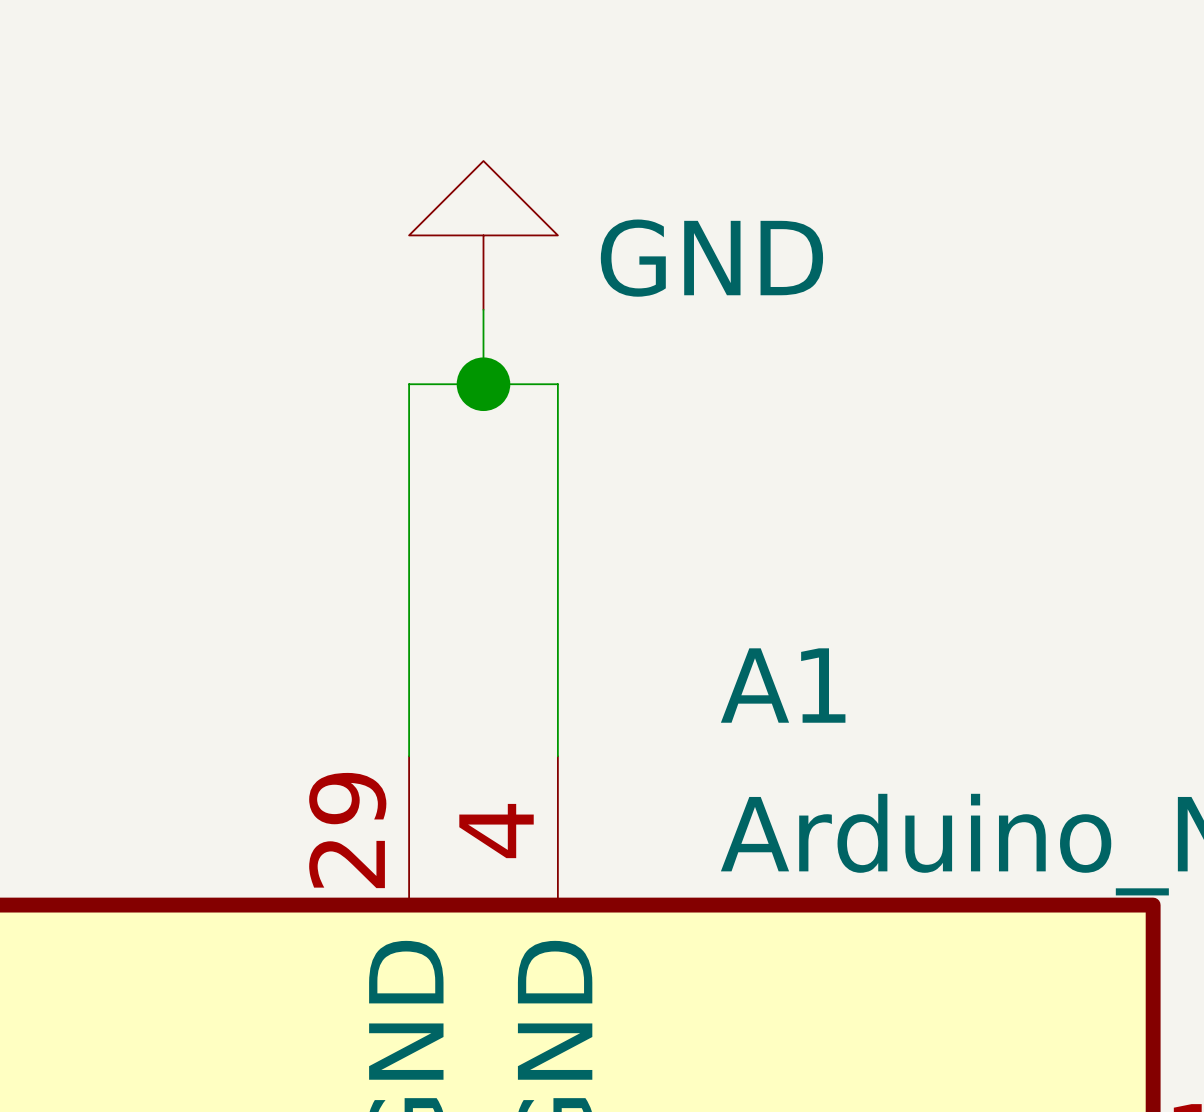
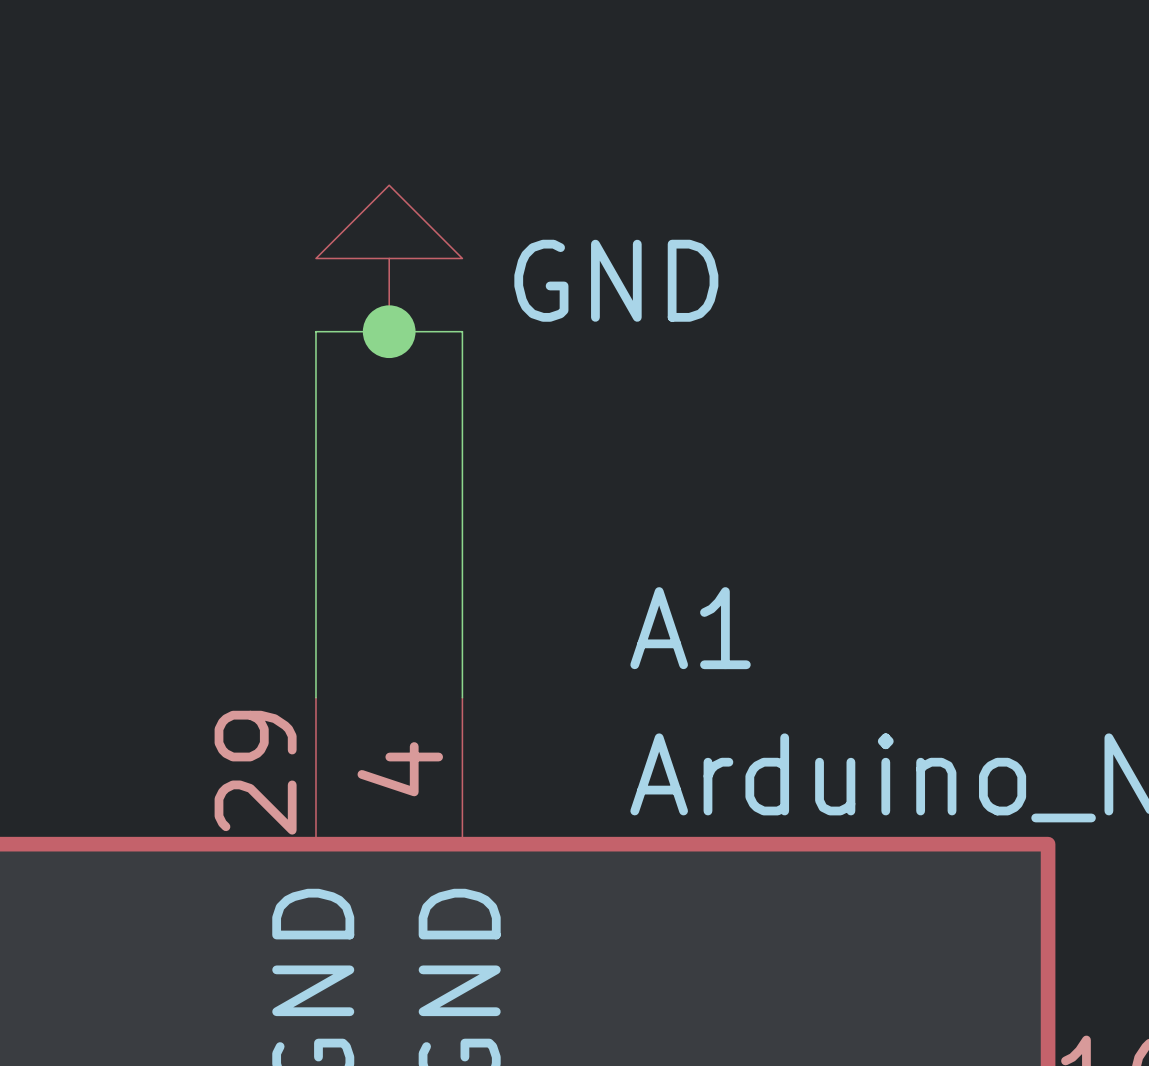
power symbol position: GND (483, 235) -> GND (389, 258)

